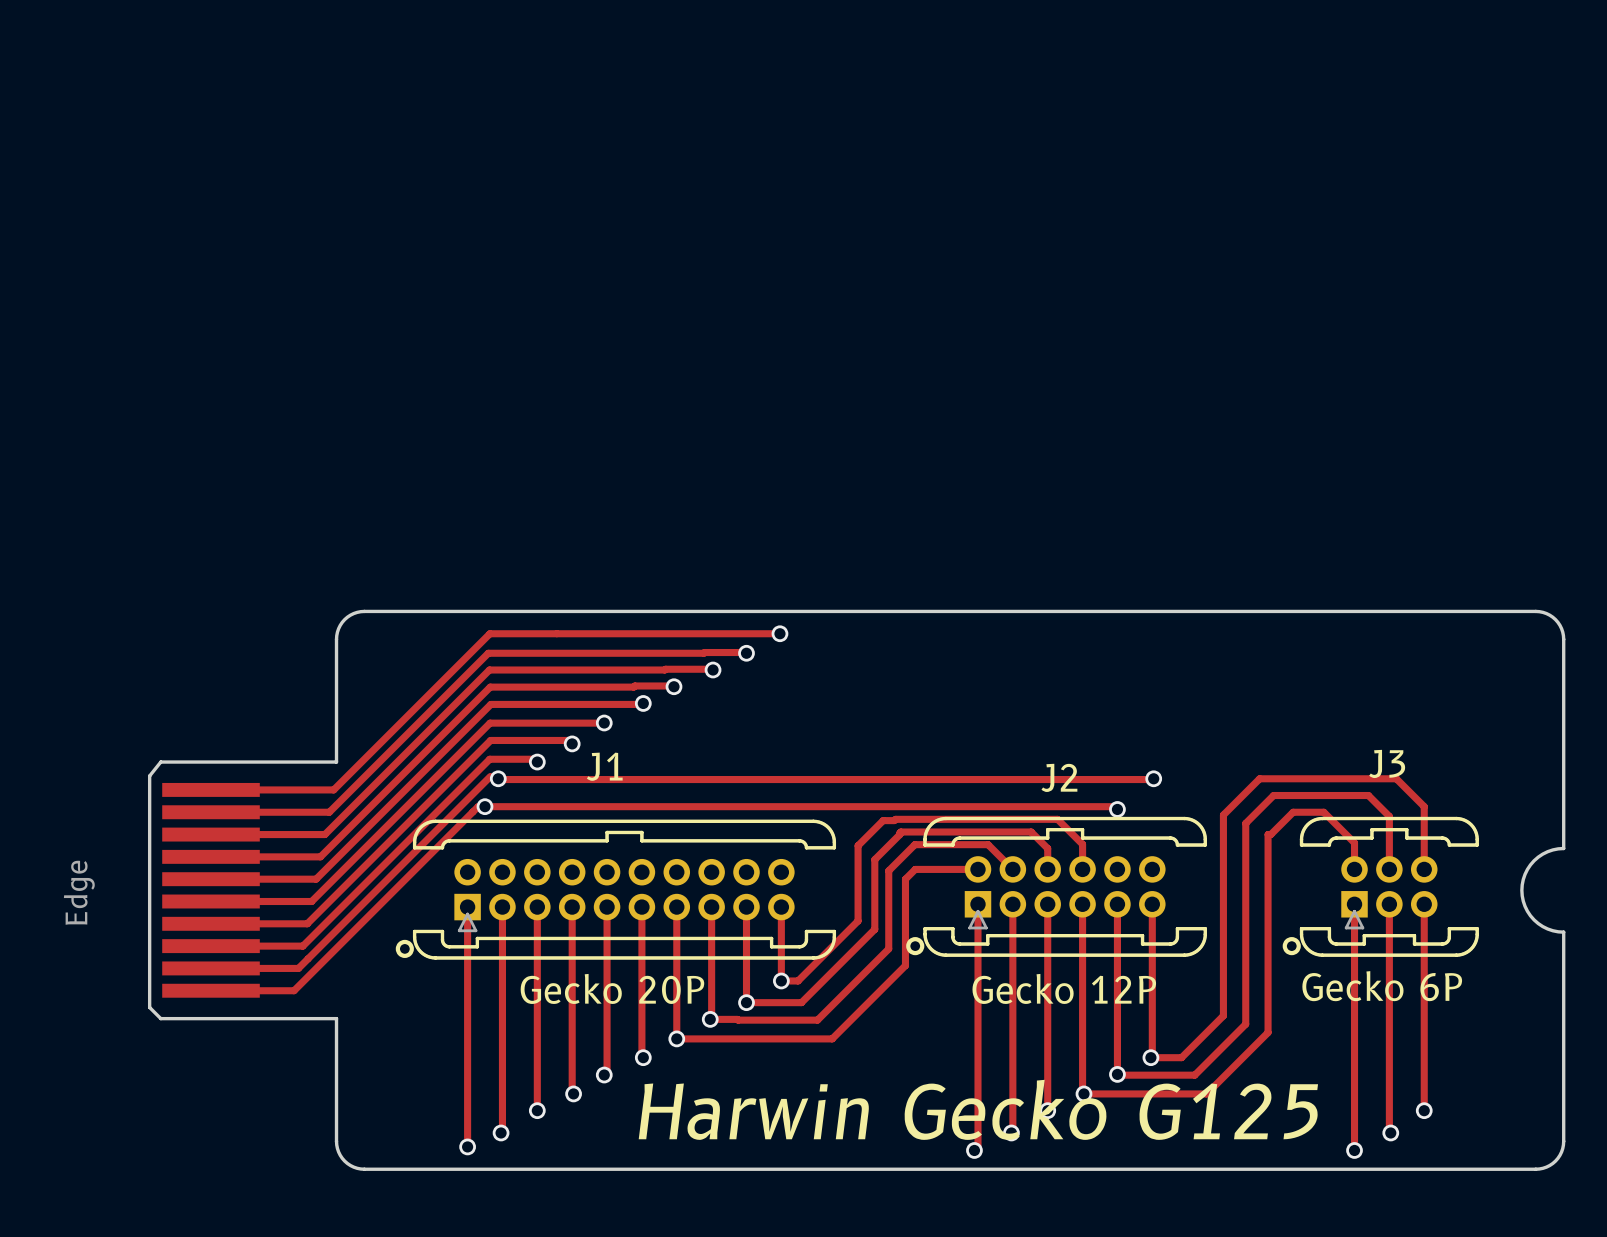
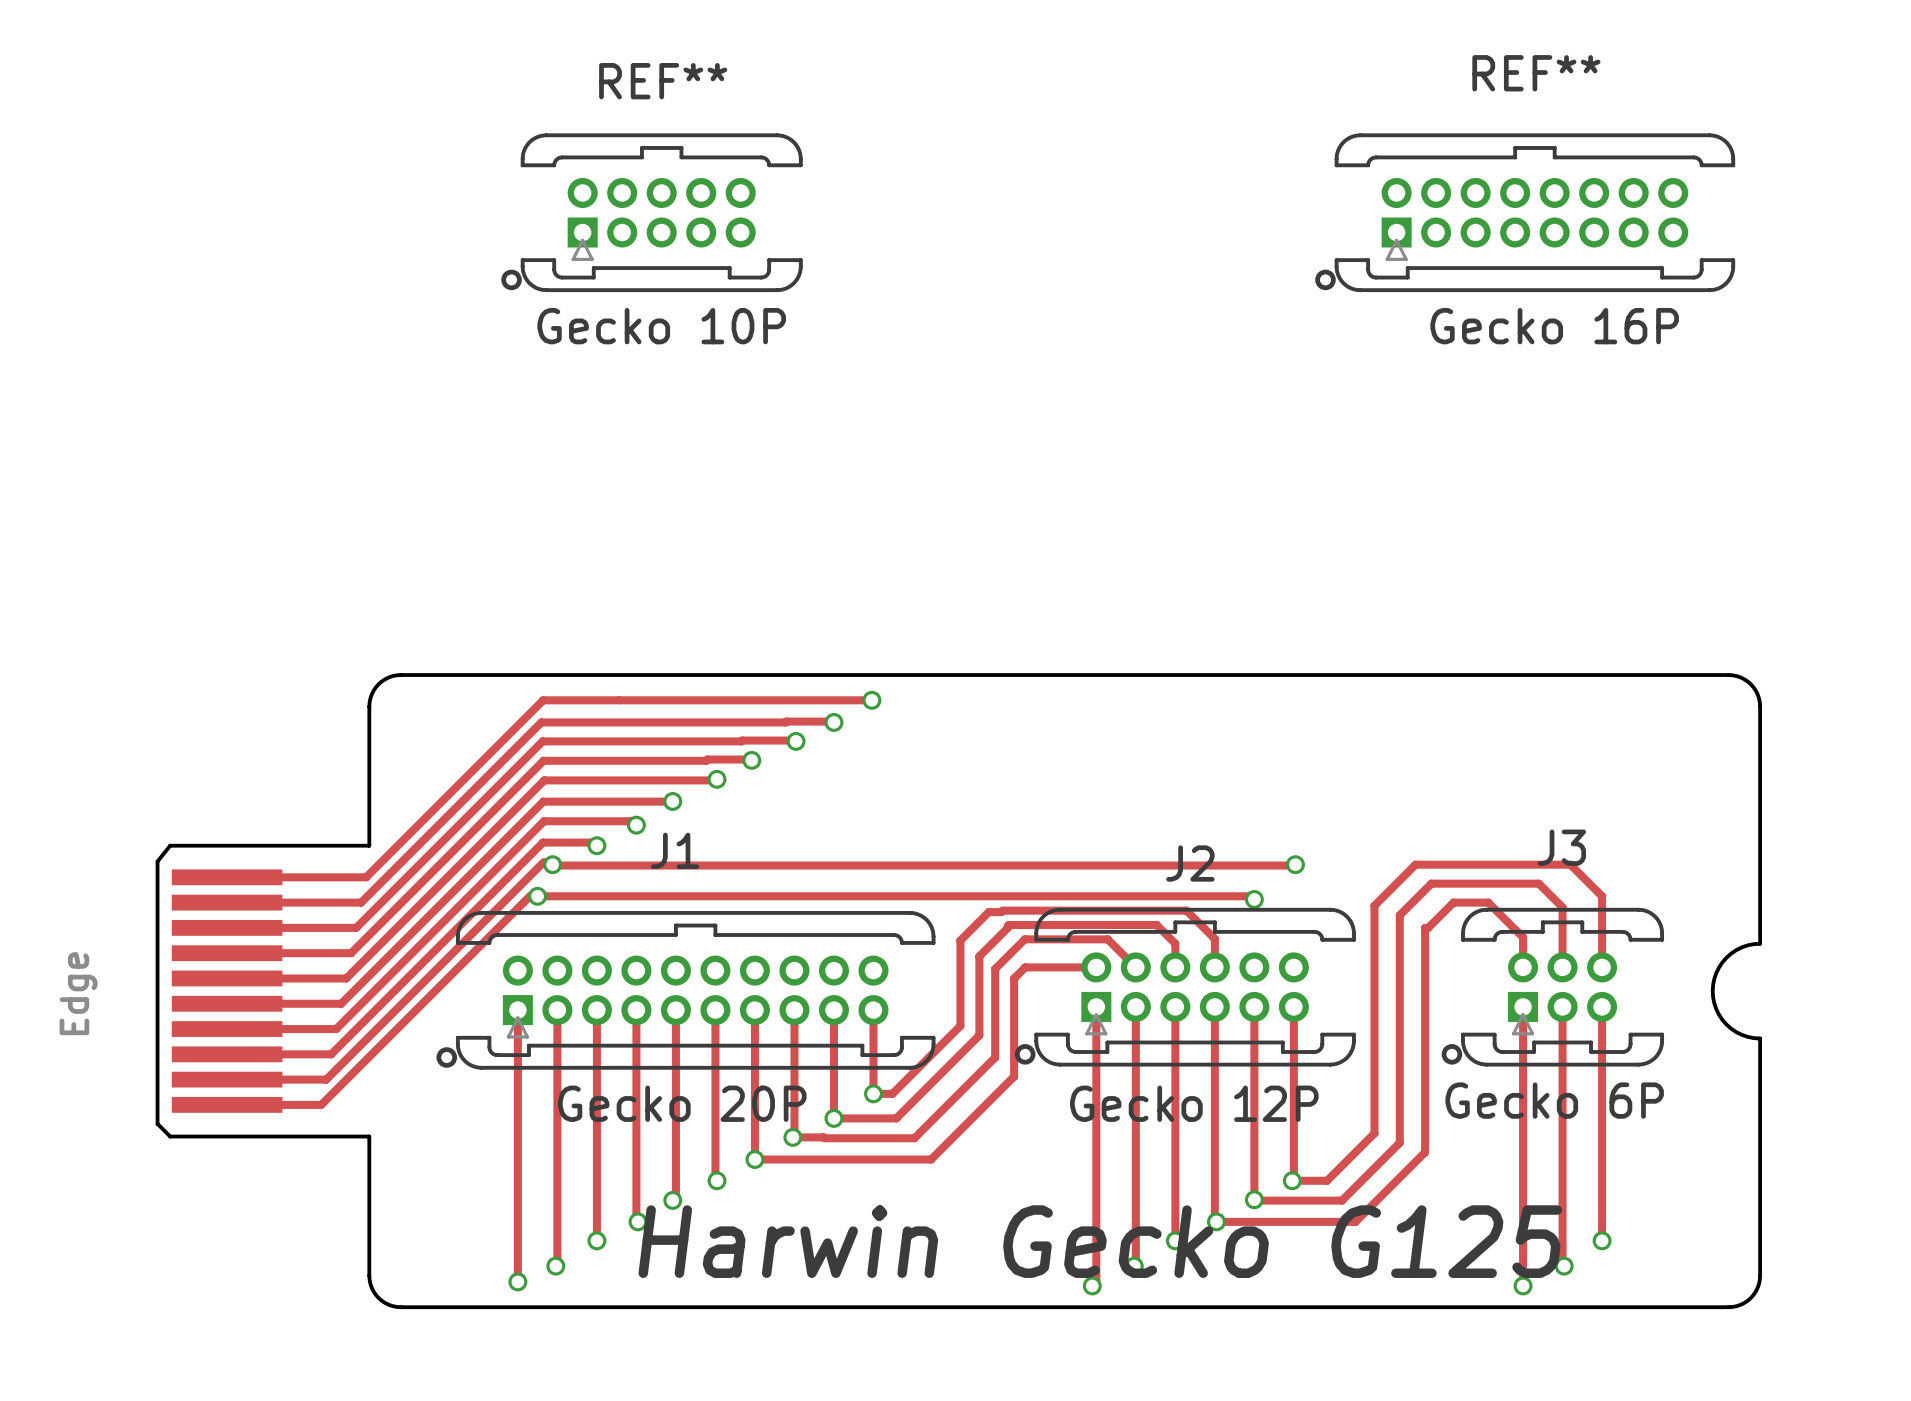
REF**: none -> Gecko 10P (651, 212)
REF**: none -> Gecko 16P (1525, 212)

